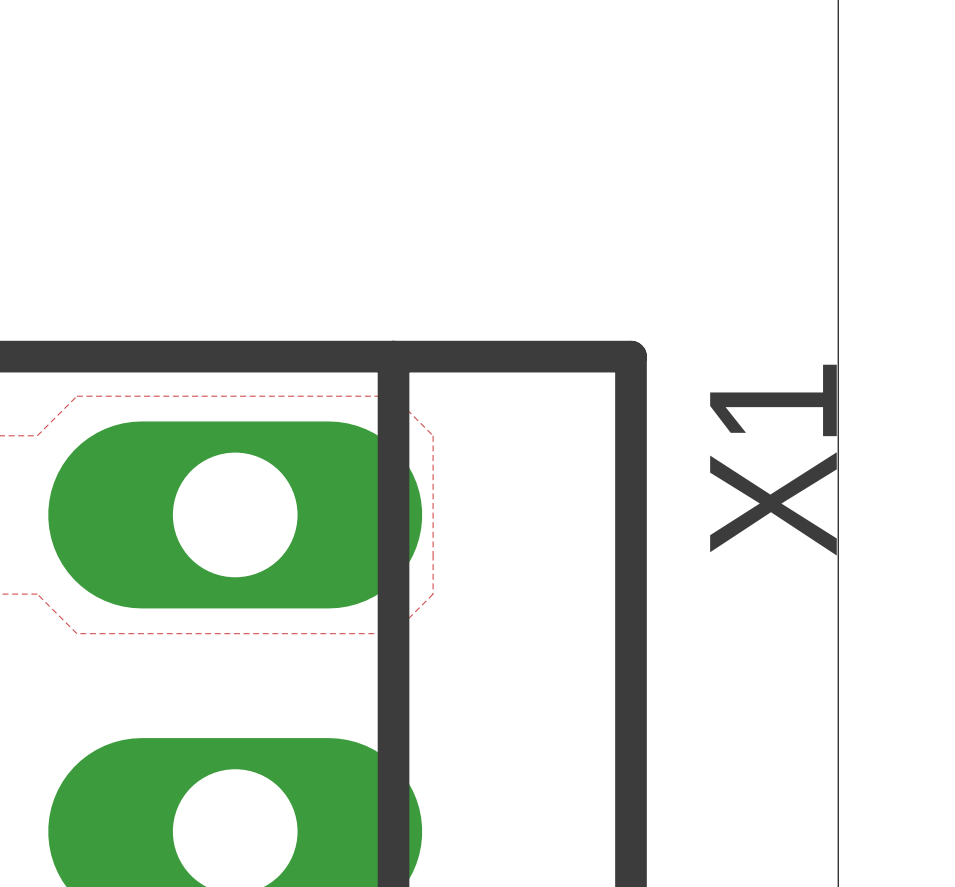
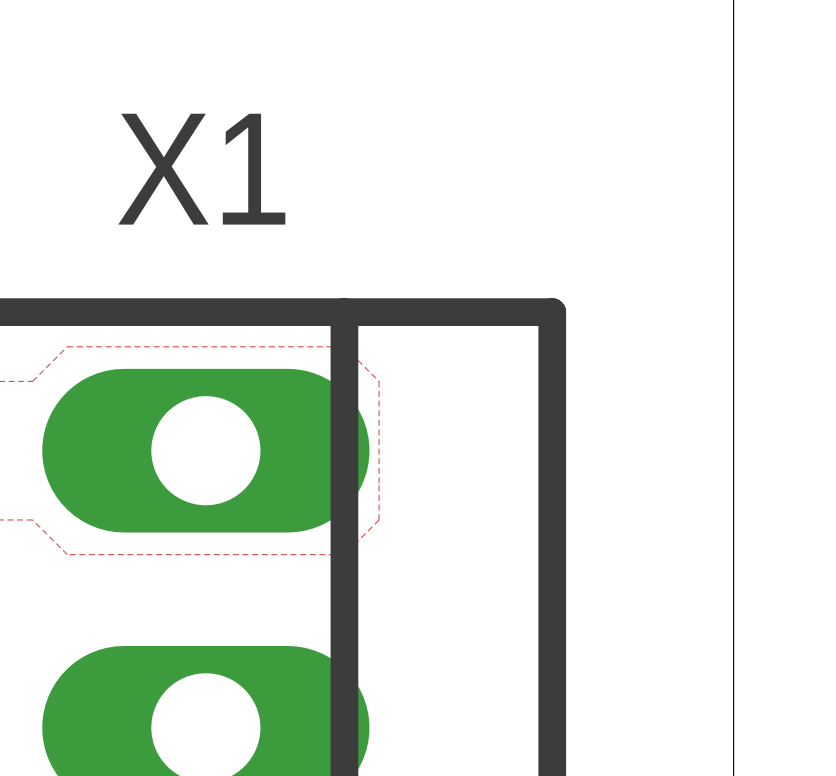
X1 name rotation: 0° (773, 460) -> 90° clockwise (201, 169)
X1 name position: X1 (773, 460) -> X1 (201, 169)

